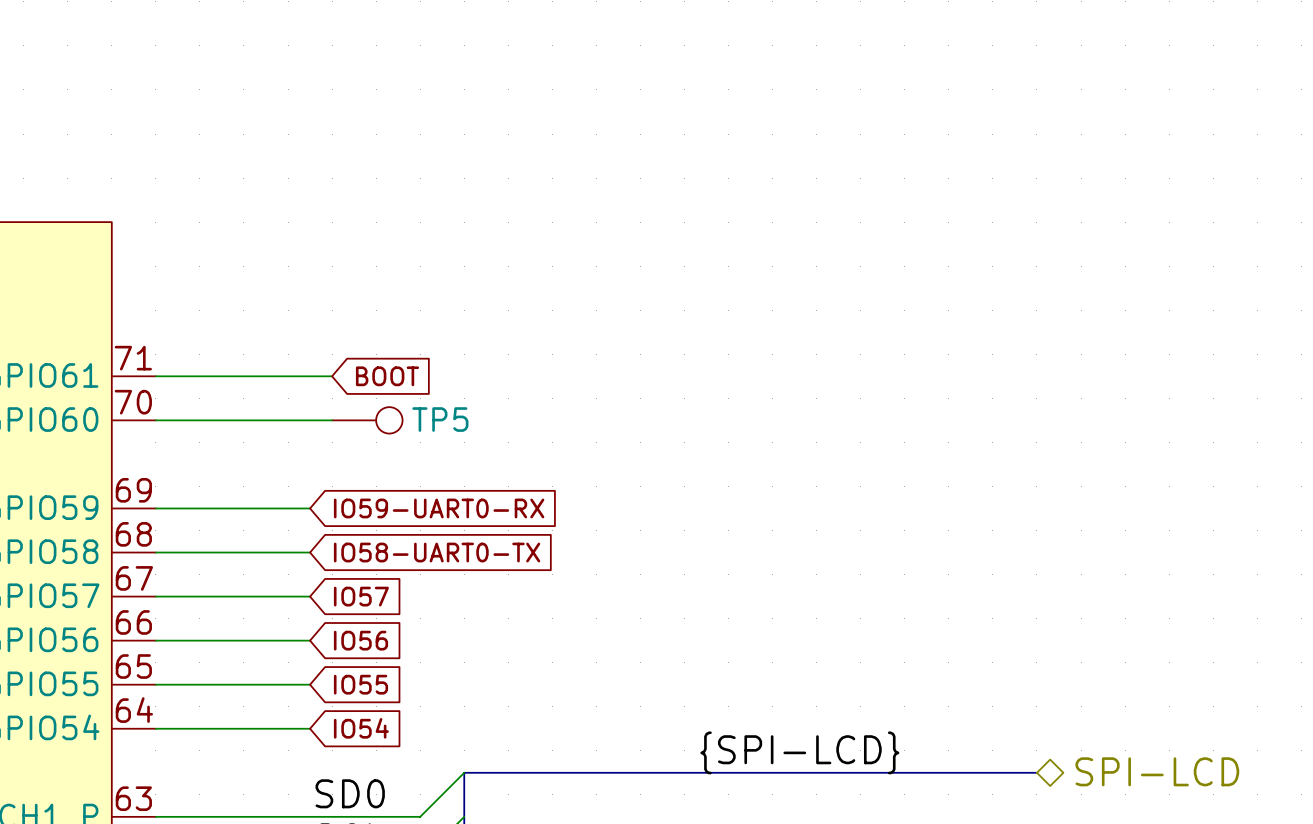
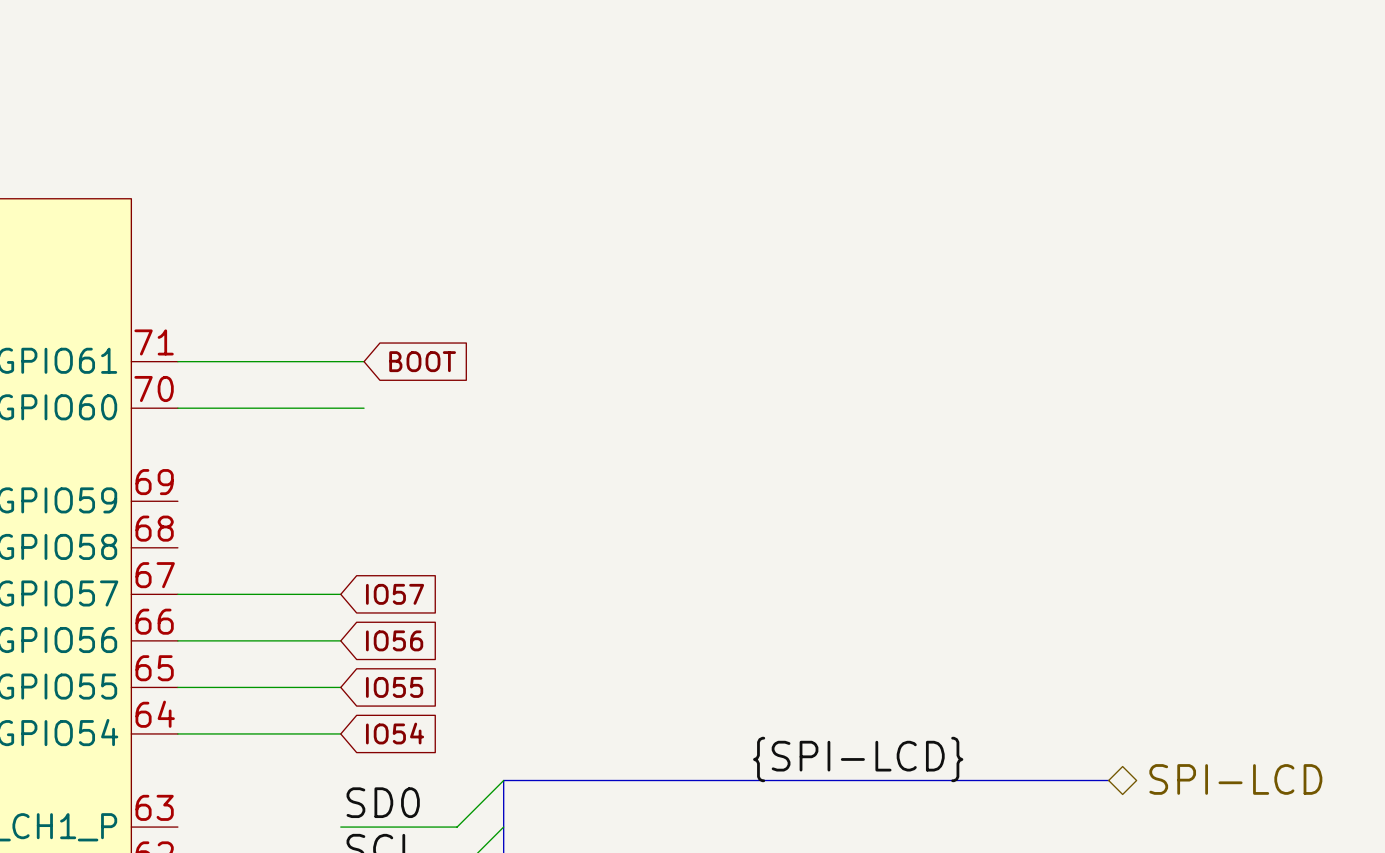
TP5: (367, 420) -> none
wire: (155, 508) (310, 508) -> none
global label: IO59-UART0-RX (439, 508) -> none
wire: (155, 552) (310, 552) -> none
global label: IO58-UART0-TX (437, 552) -> none
wire: (155, 816) (310, 816) -> none

